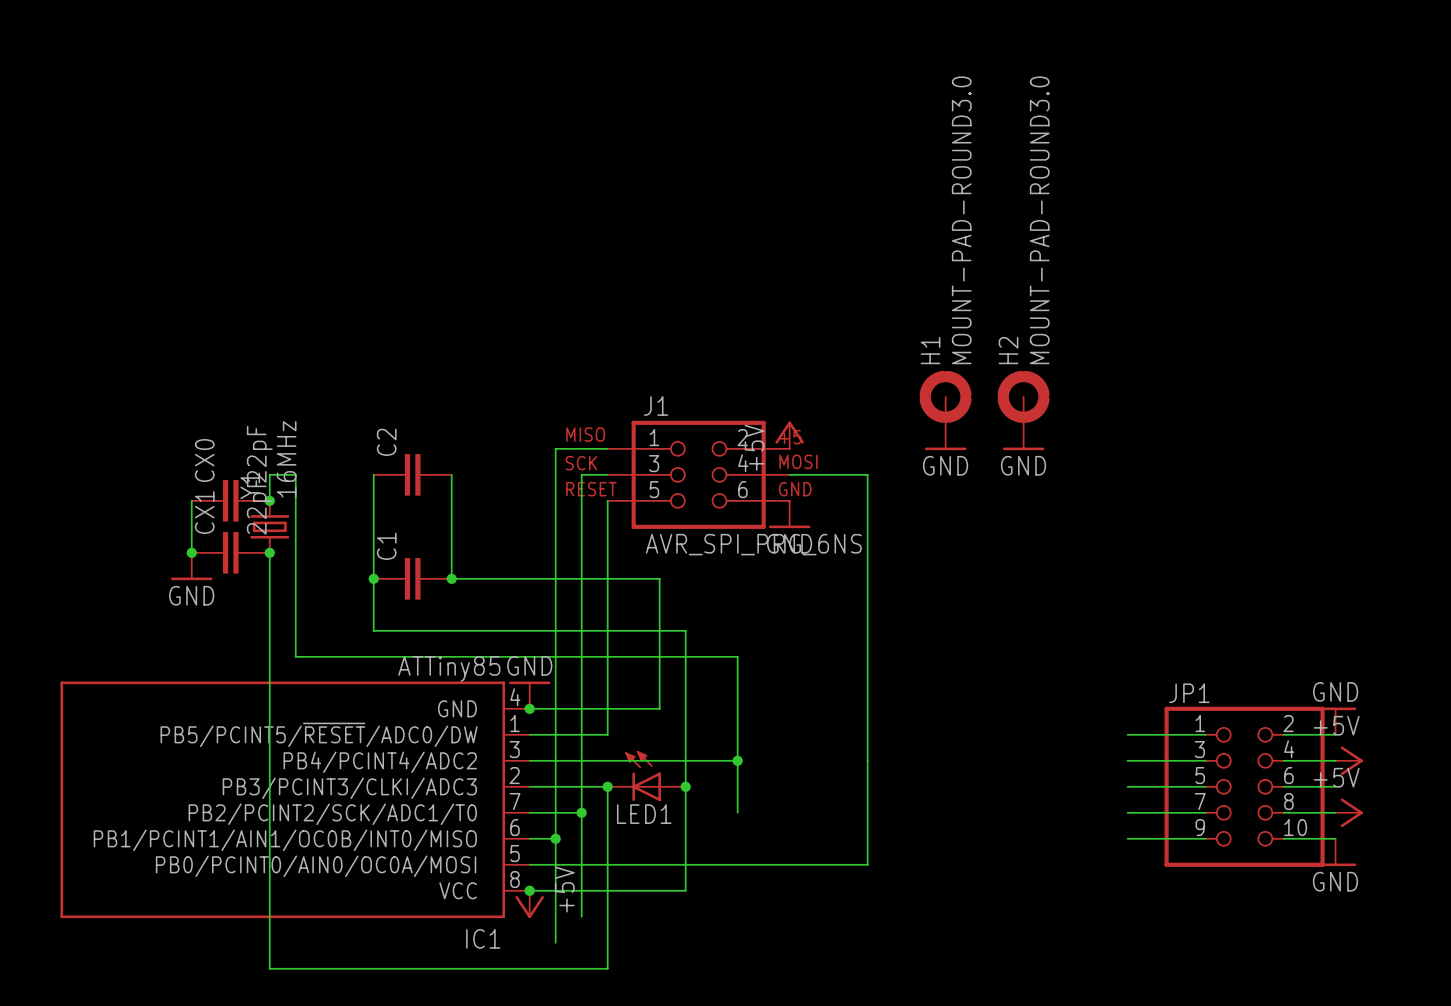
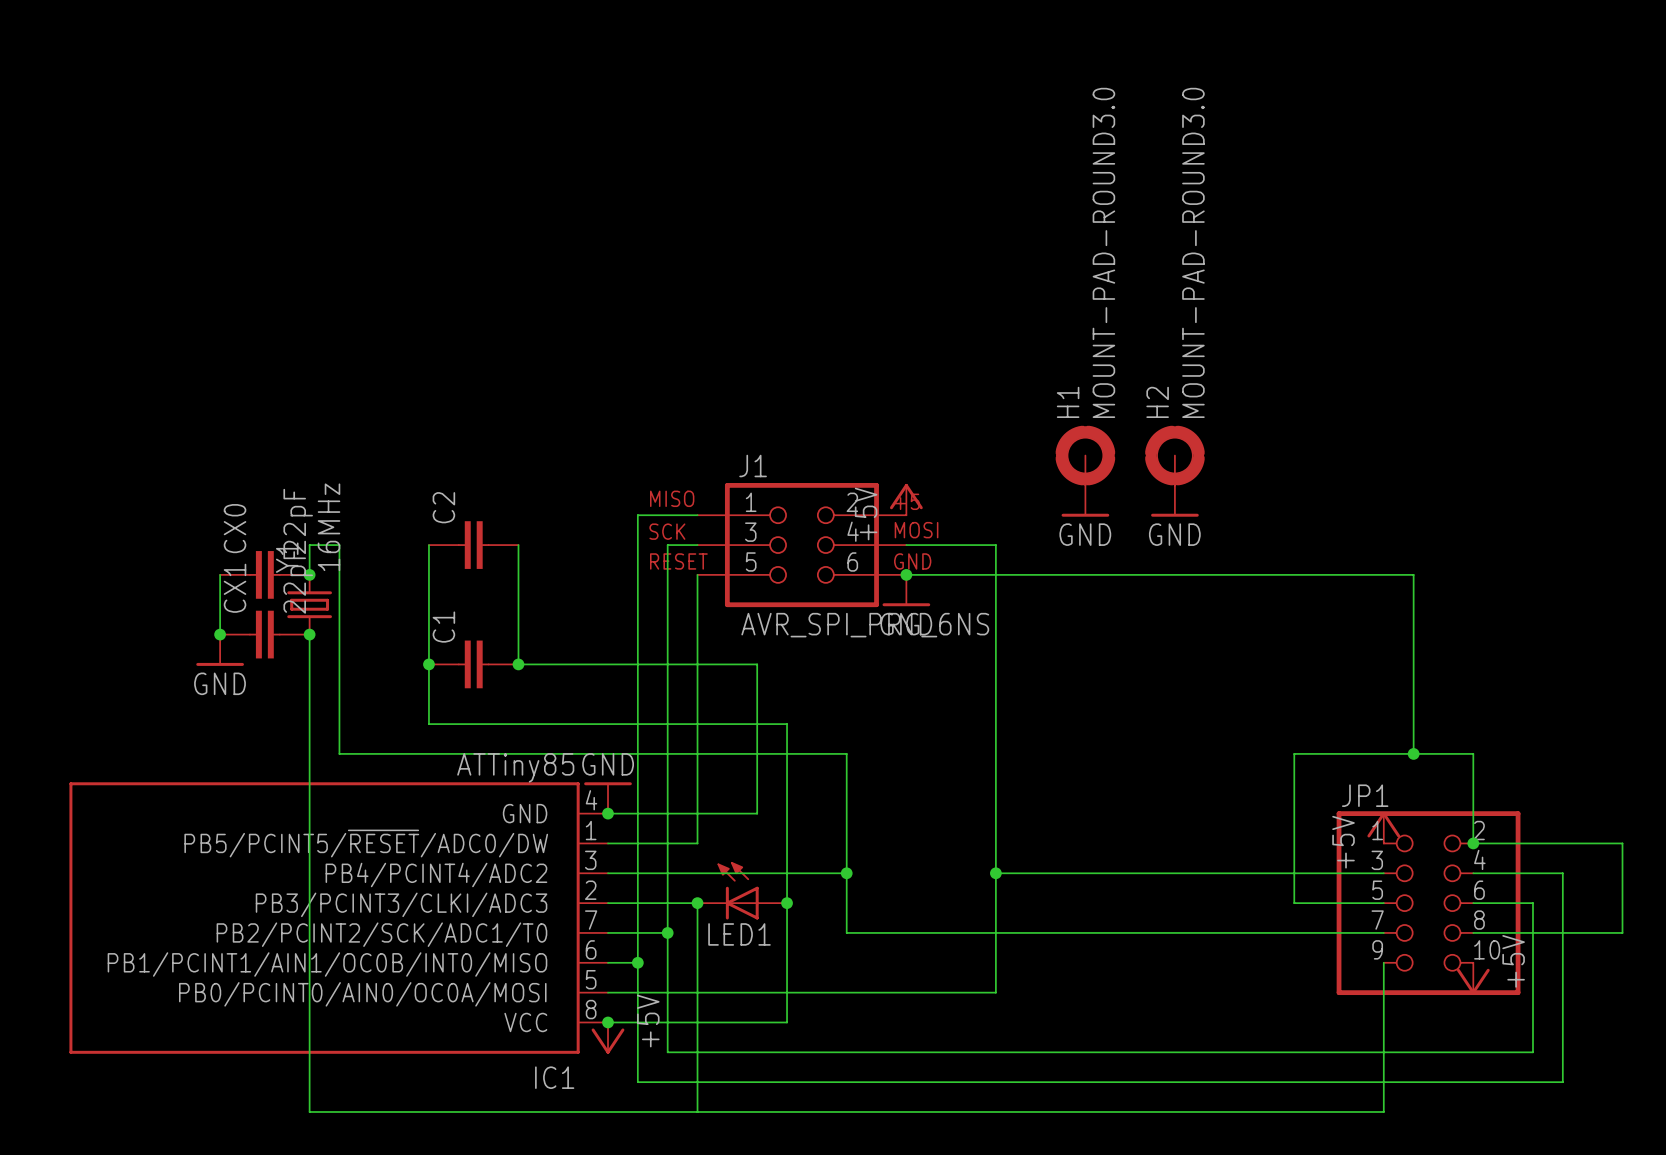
wire: none -> (906, 574) (1413, 574) (1413, 753)
junction: none -> (906, 574)
junction: none -> (1413, 753)
power symbol: none -> +5V (1383, 827)
power symbol: GND (1335, 721) -> none
wire: (1127, 734) (1205, 734) -> none
wire: none -> (1473, 843) (1473, 753) (1294, 753) (1294, 903)
junction: none -> (1473, 843)
wire: none -> (1532, 843) (1622, 843) (1622, 932) (1532, 932)
wire: none -> (995, 873) (1294, 873)
junction: none -> (995, 873)
wire: none -> (1532, 873) (1562, 873) (1562, 1082) (637, 1082)
power symbol: +5V (1349, 760) -> none
wire: none -> (1532, 903) (1532, 1052) (667, 1052)
wire: none -> (846, 932) (1294, 932)
power symbol: +5V (1349, 812) -> none
wire: (1127, 838) (1205, 838) -> (697, 1111) (1383, 1111) (1383, 962)
wire: (1283, 838) (1335, 838) -> none
power symbol: none -> +5V (1473, 978)
power symbol: GND (1335, 852) -> none

